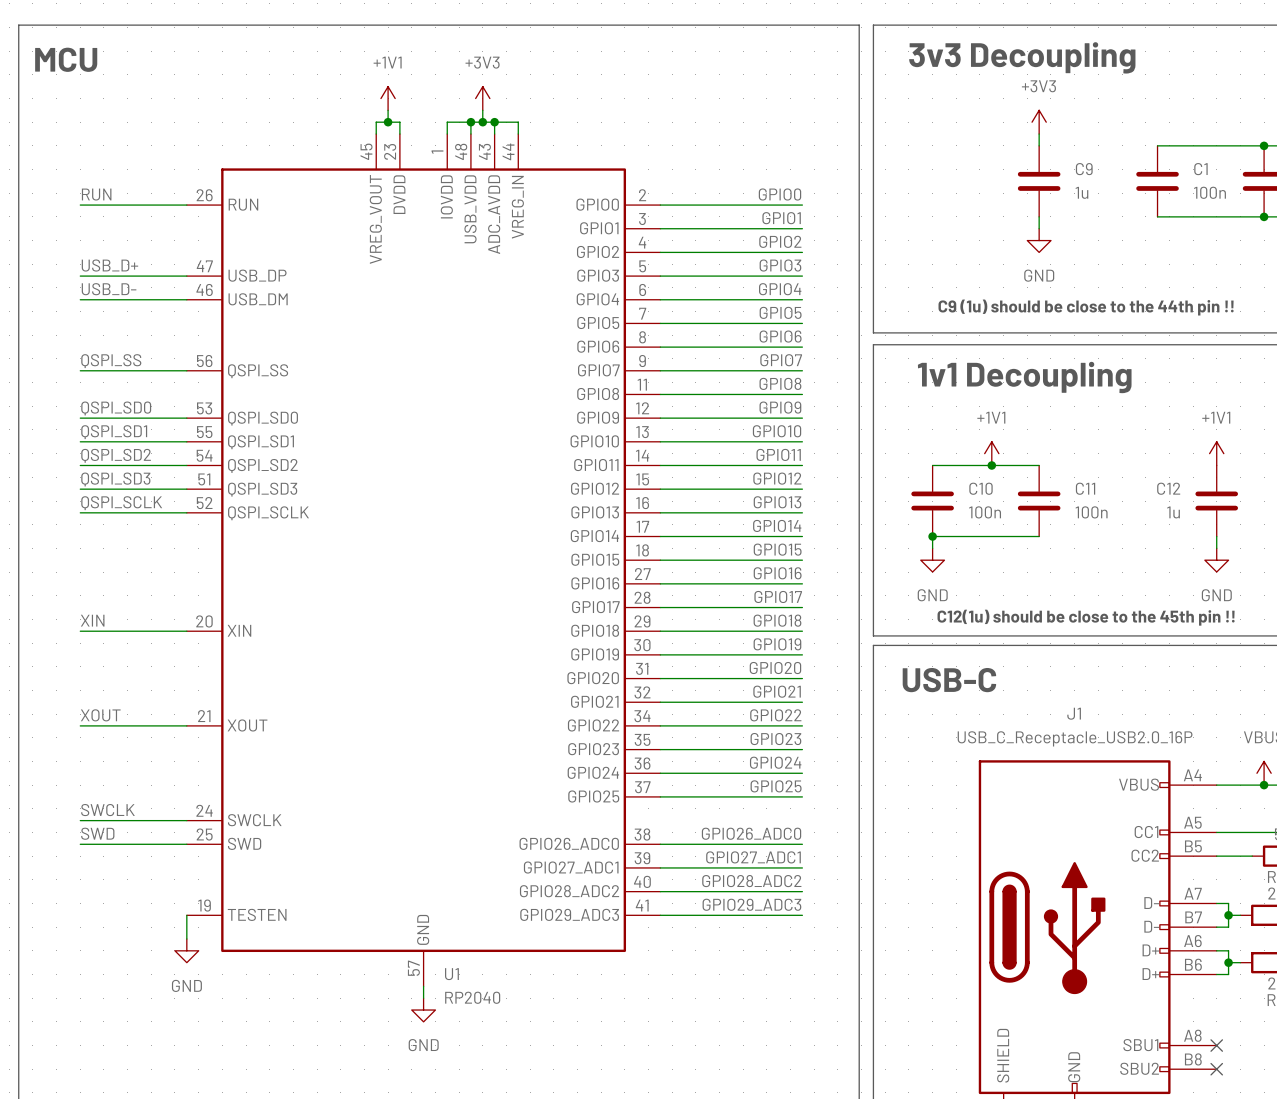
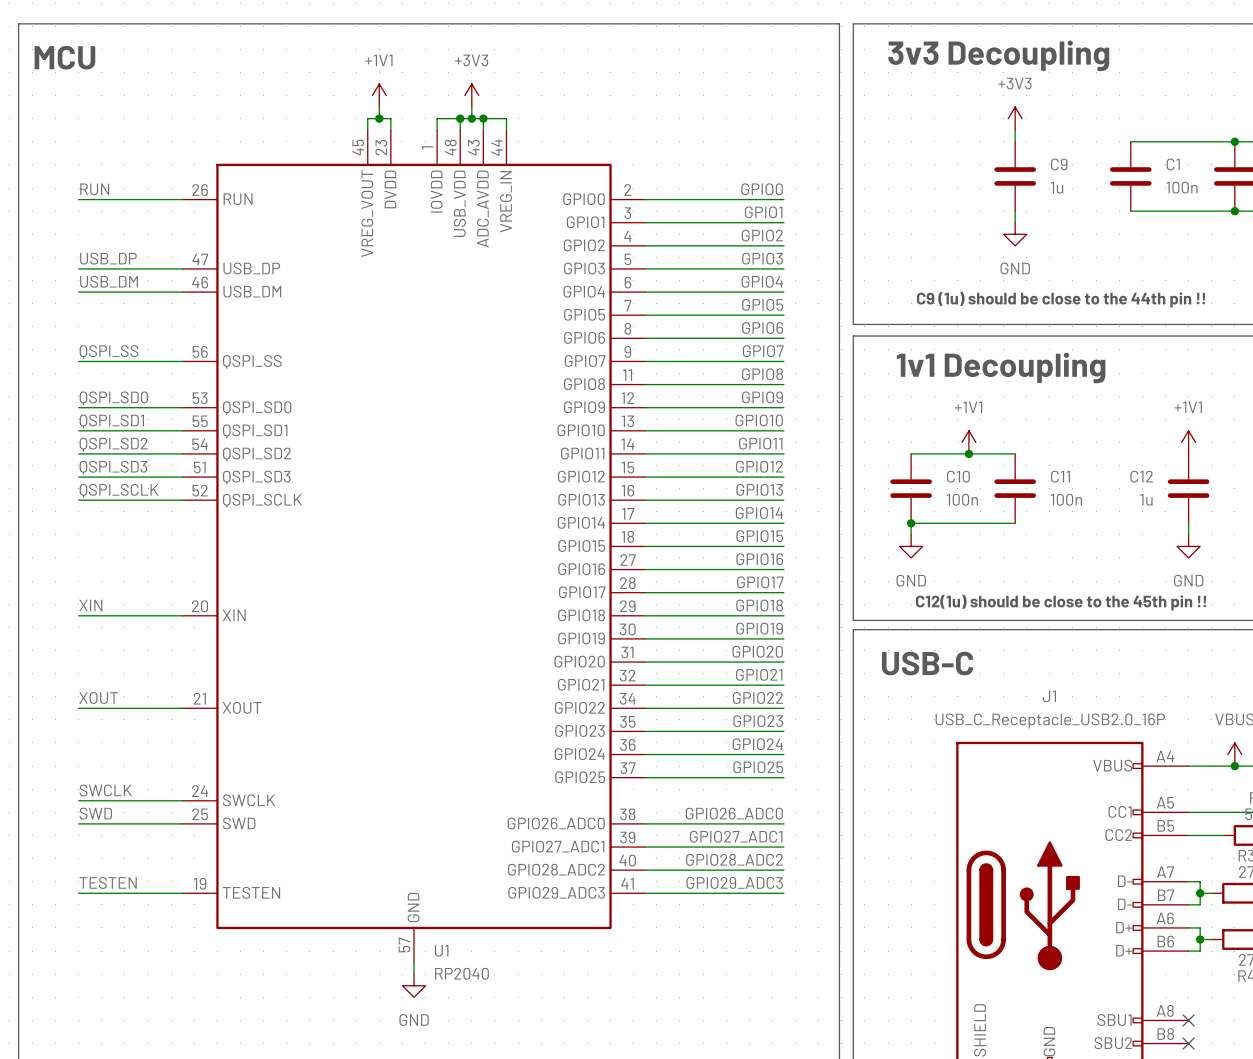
label: USB_D+ (109, 265) -> USB_DP (108, 258)
label: USB_D- (109, 289) -> USB_DM (109, 281)
label: none -> TESTEN (108, 882)
wire: (186, 915) (186, 938) -> (182, 893) (78, 893)
power symbol: GND (186, 950) -> none

